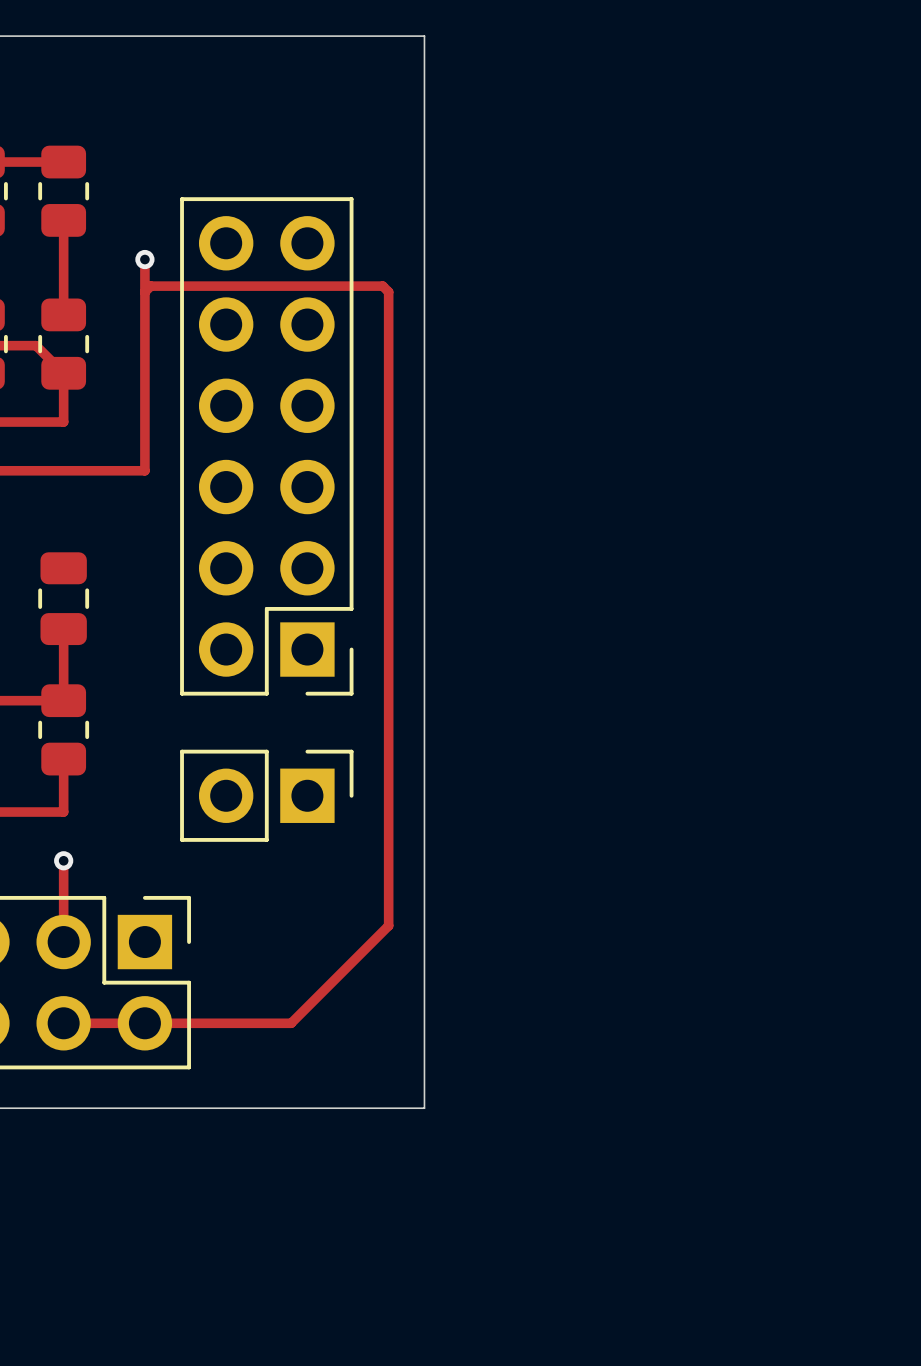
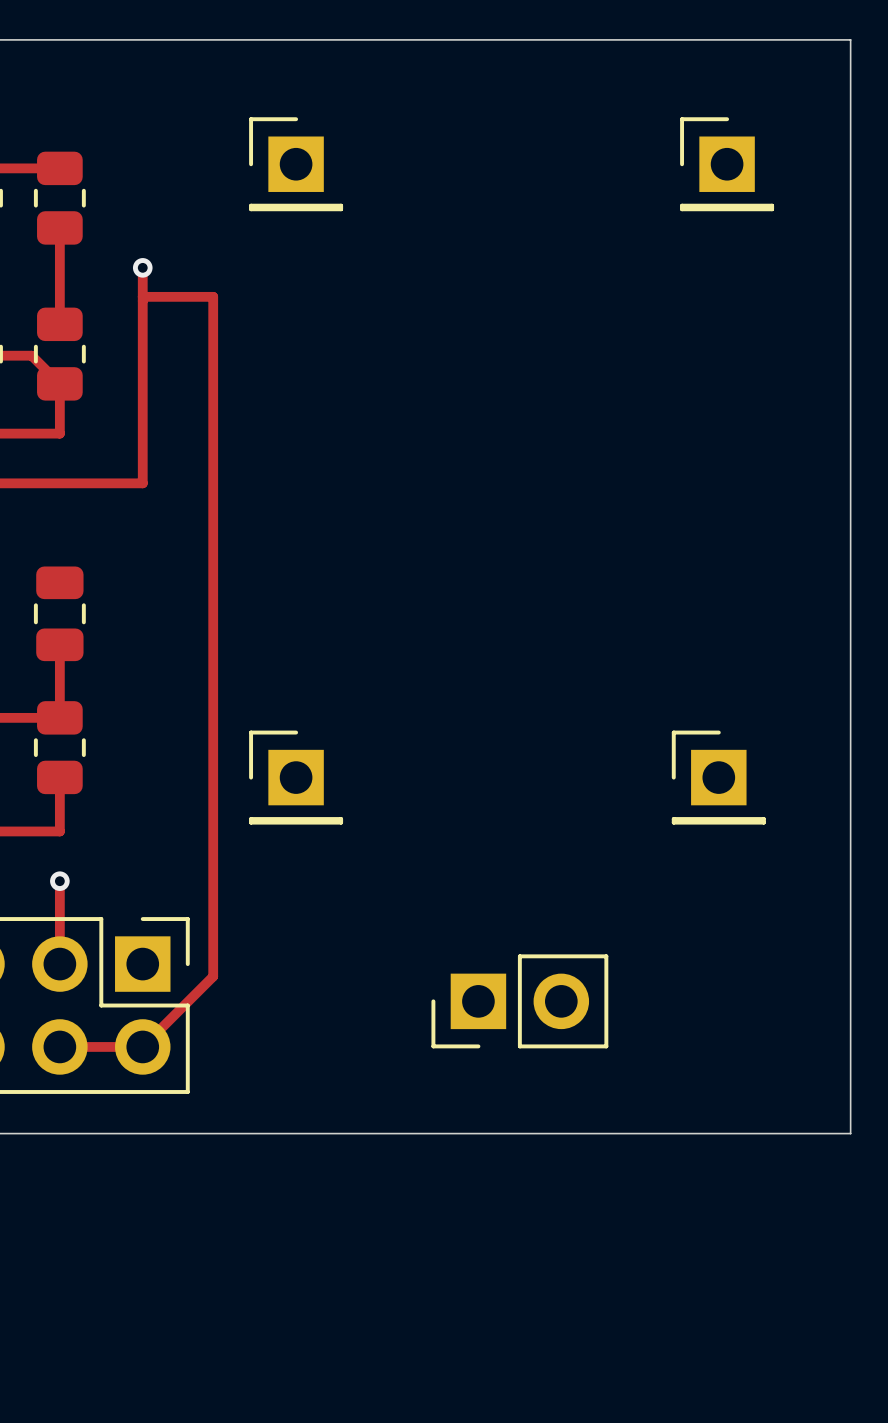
board edge: (424, 36) (424, 1108) -> (427, 39) (850, 39) (850, 1133) (427, 1133)
part: none -> (296, 164)
part: none -> (727, 164)
track: (144, 292) (150, 286) (382, 286) (388, 292) (388, 925) (291, 1023) (144, 1023) -> (142, 296) (213, 296) (213, 976) (142, 1046)
part: (266, 446) -> none
part: none -> (296, 777)
part: none -> (718, 777)
part rotation: 0° (266, 795) -> 180° (519, 1001)
part position: (266, 795) -> (519, 1001)

